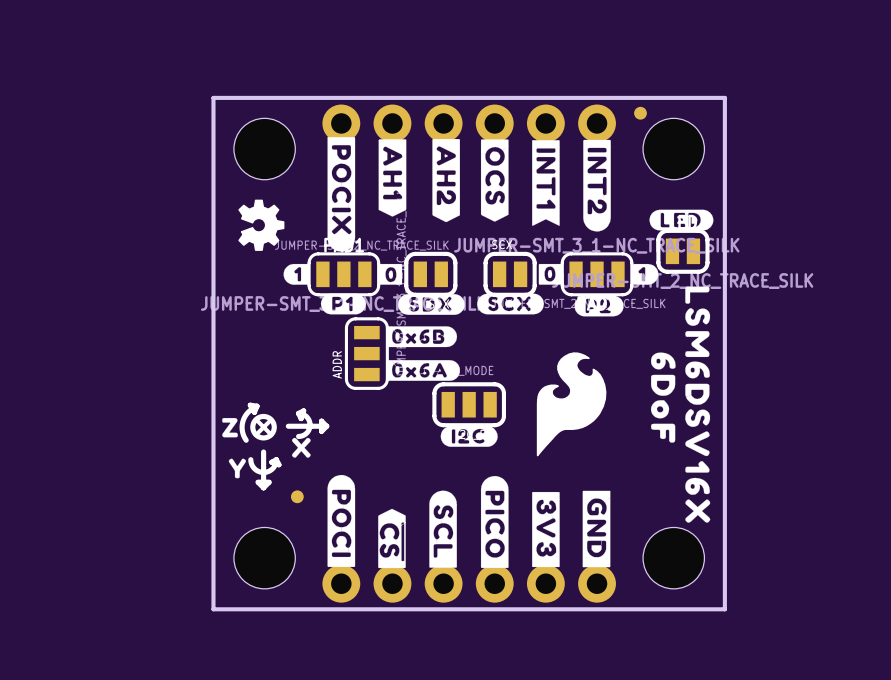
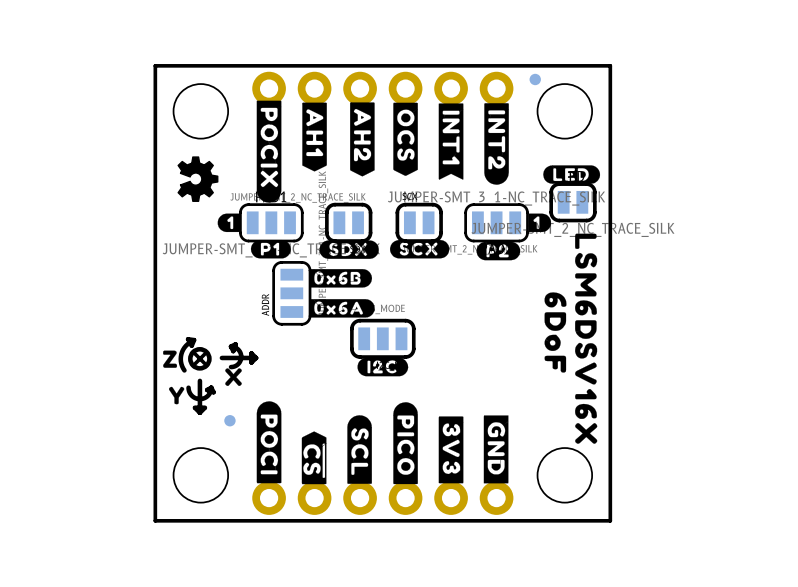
drawing: [377, 263, 403, 285] -> none
drawing: [538, 263, 564, 285] -> none
drawing: [536, 352, 607, 457] -> none

